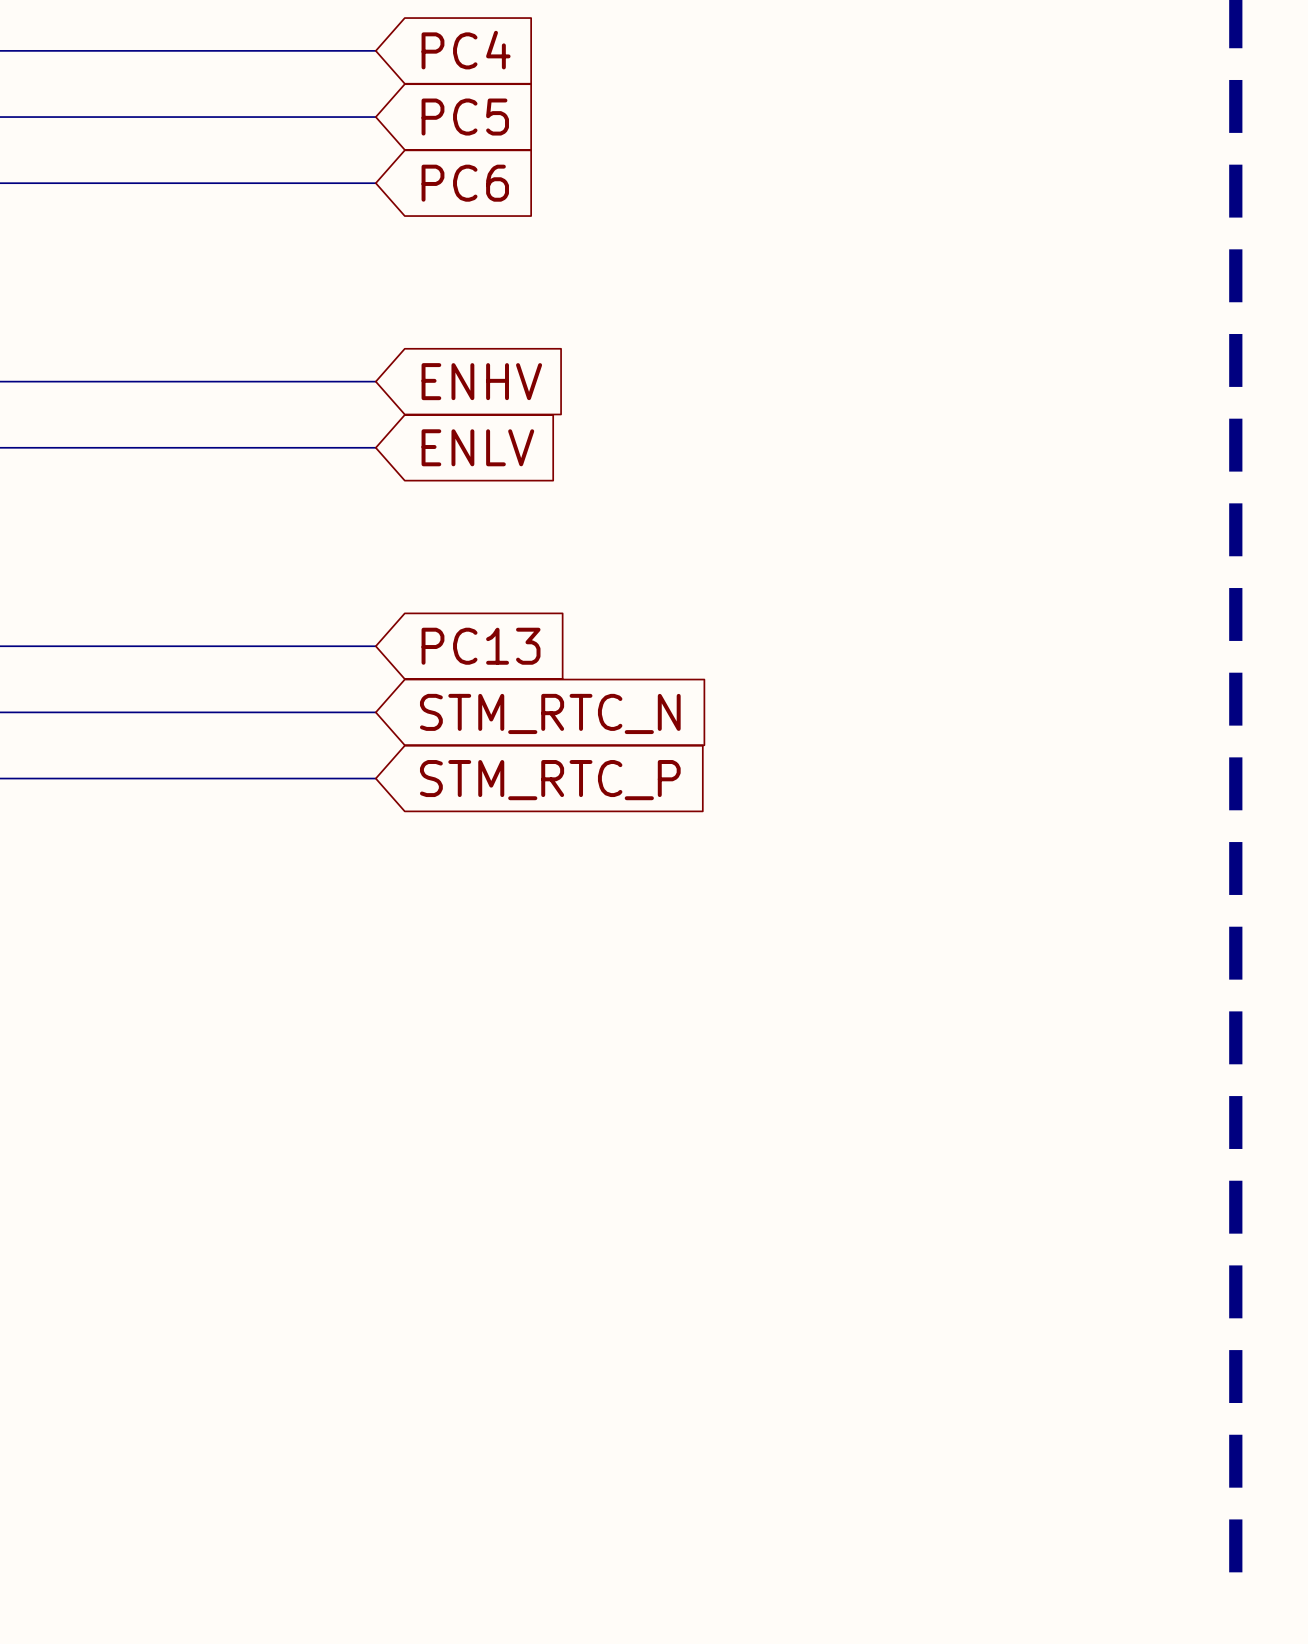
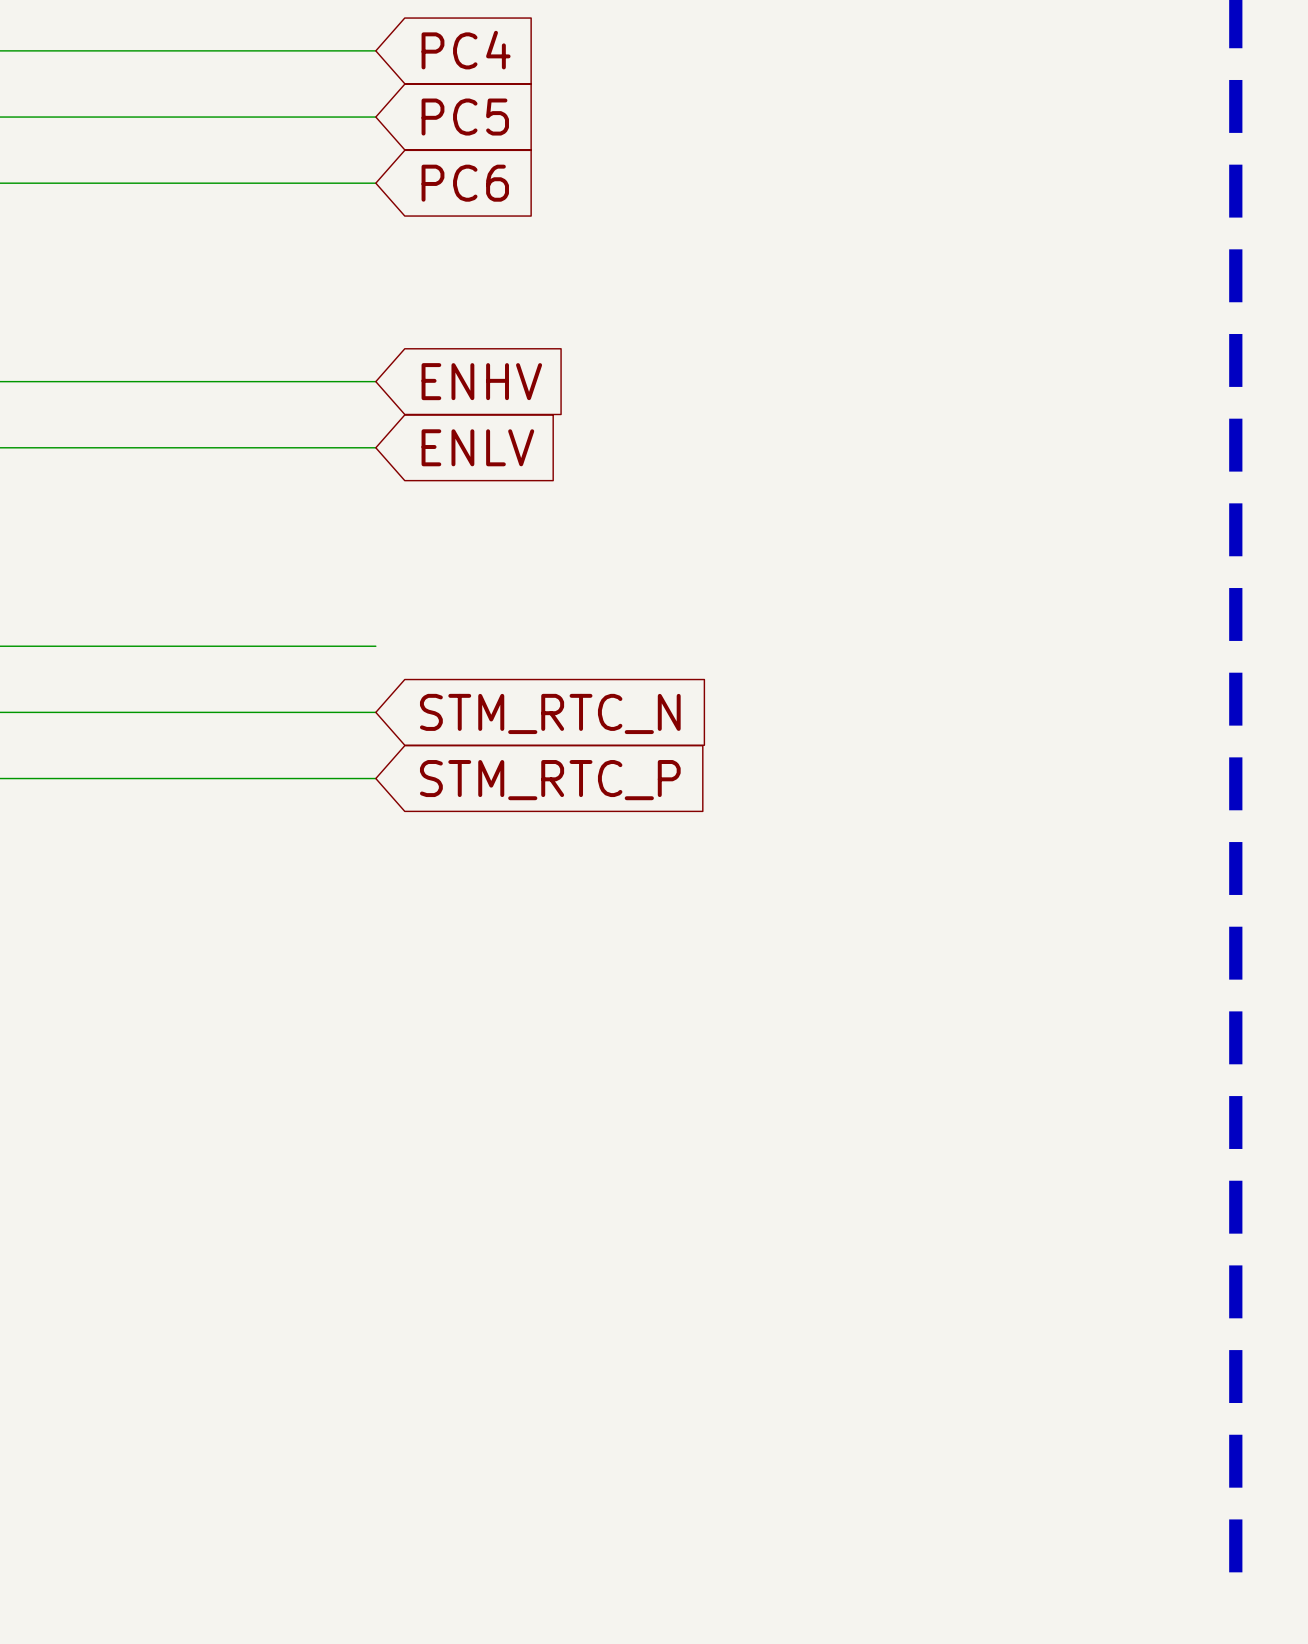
global label: PC13 (481, 646) -> none

